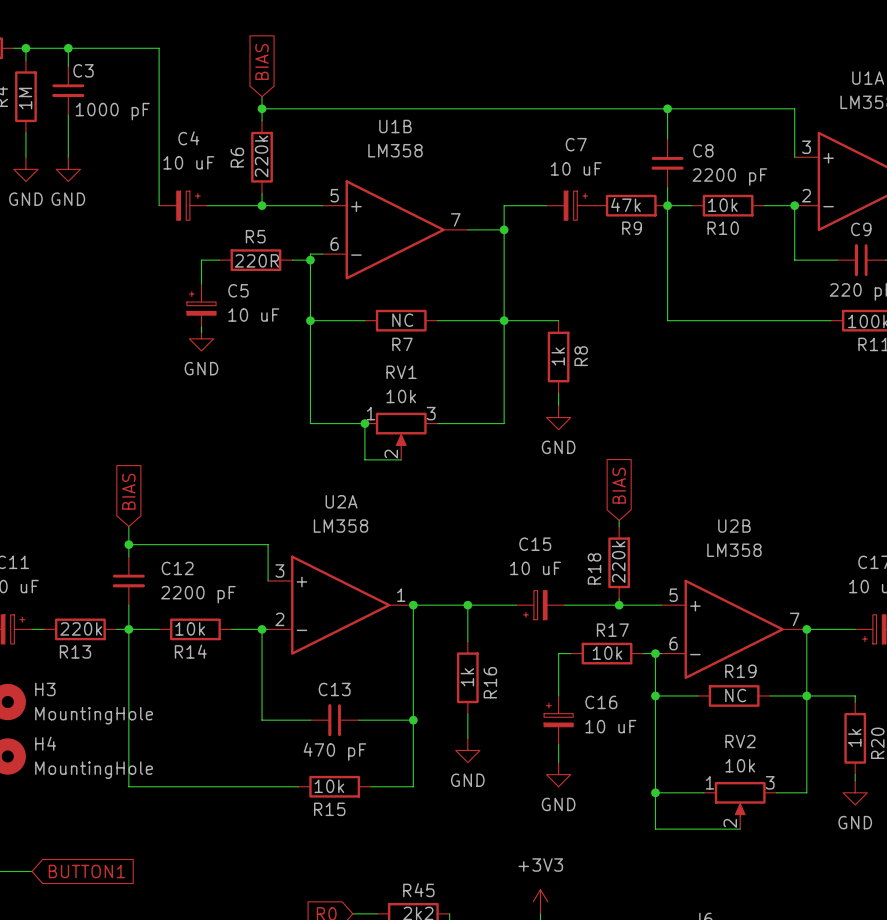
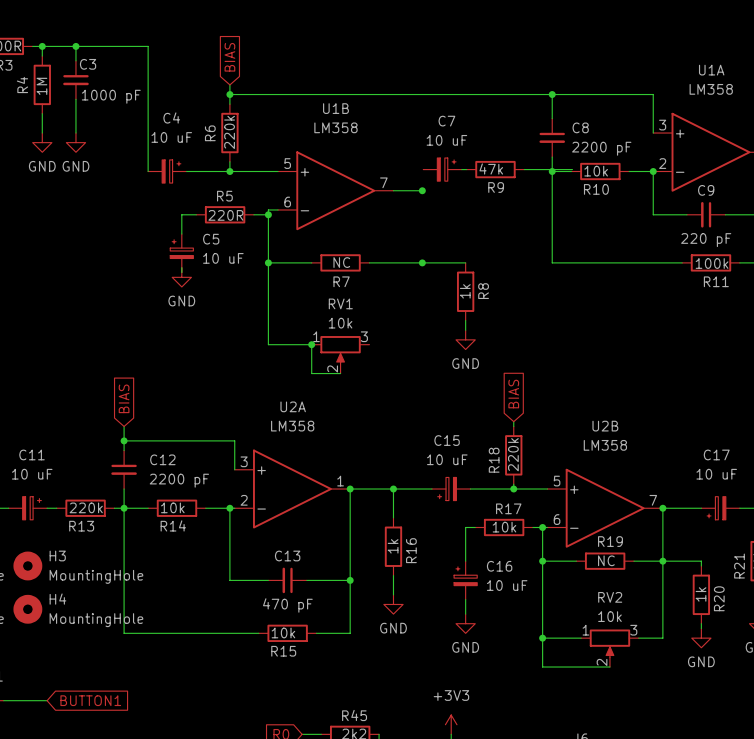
wire: none -> (461, 169) (466, 169)
wire: none -> (524, 169) (572, 169)
wire: (546, 205) (504, 205) (504, 423) (437, 423) -> none
C7 position: (570, 205) -> (442, 169)
R9 position: (631, 205) -> (495, 169)

